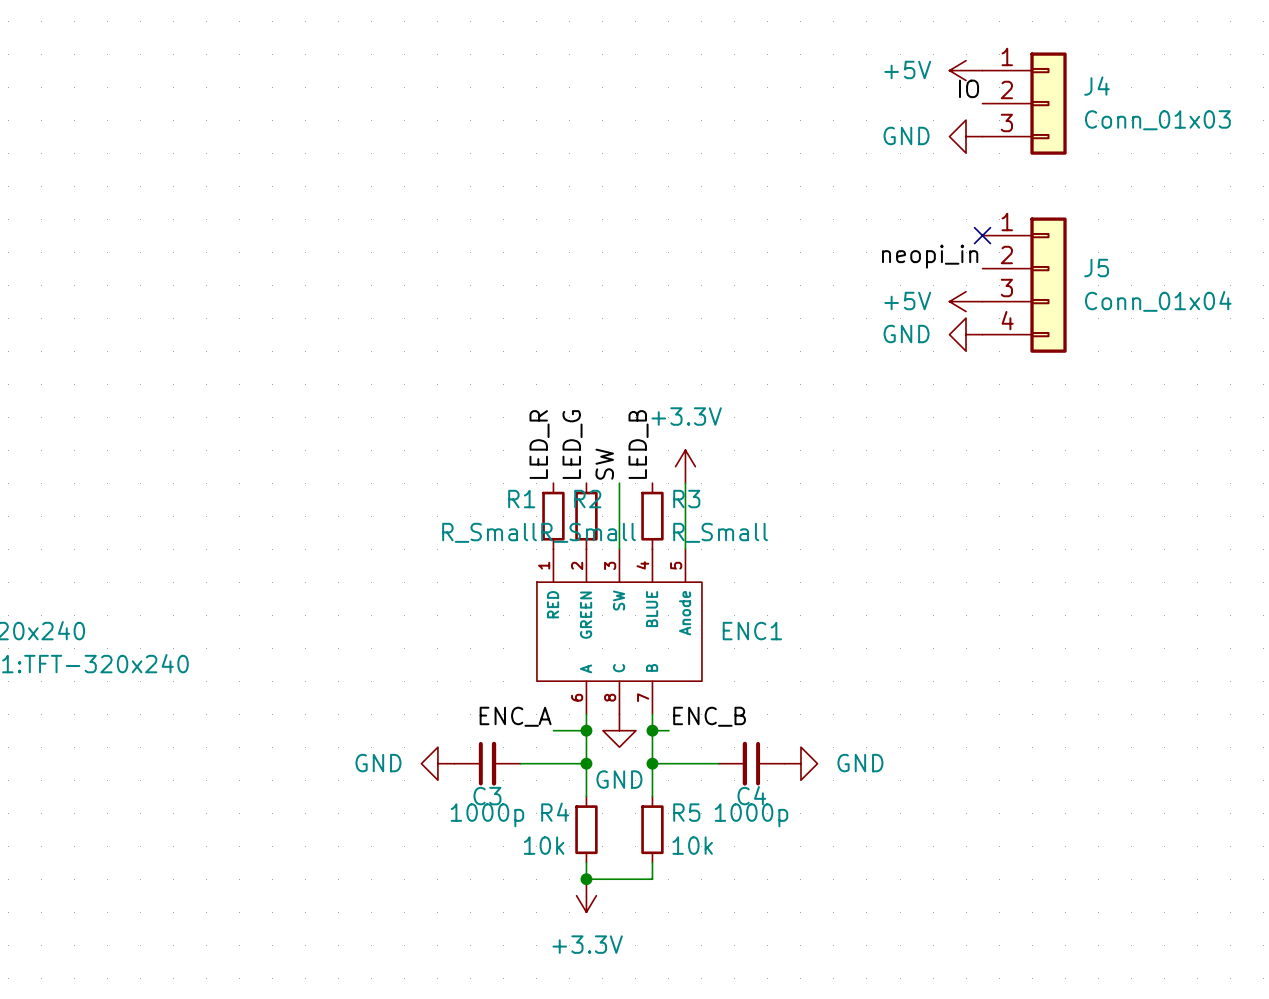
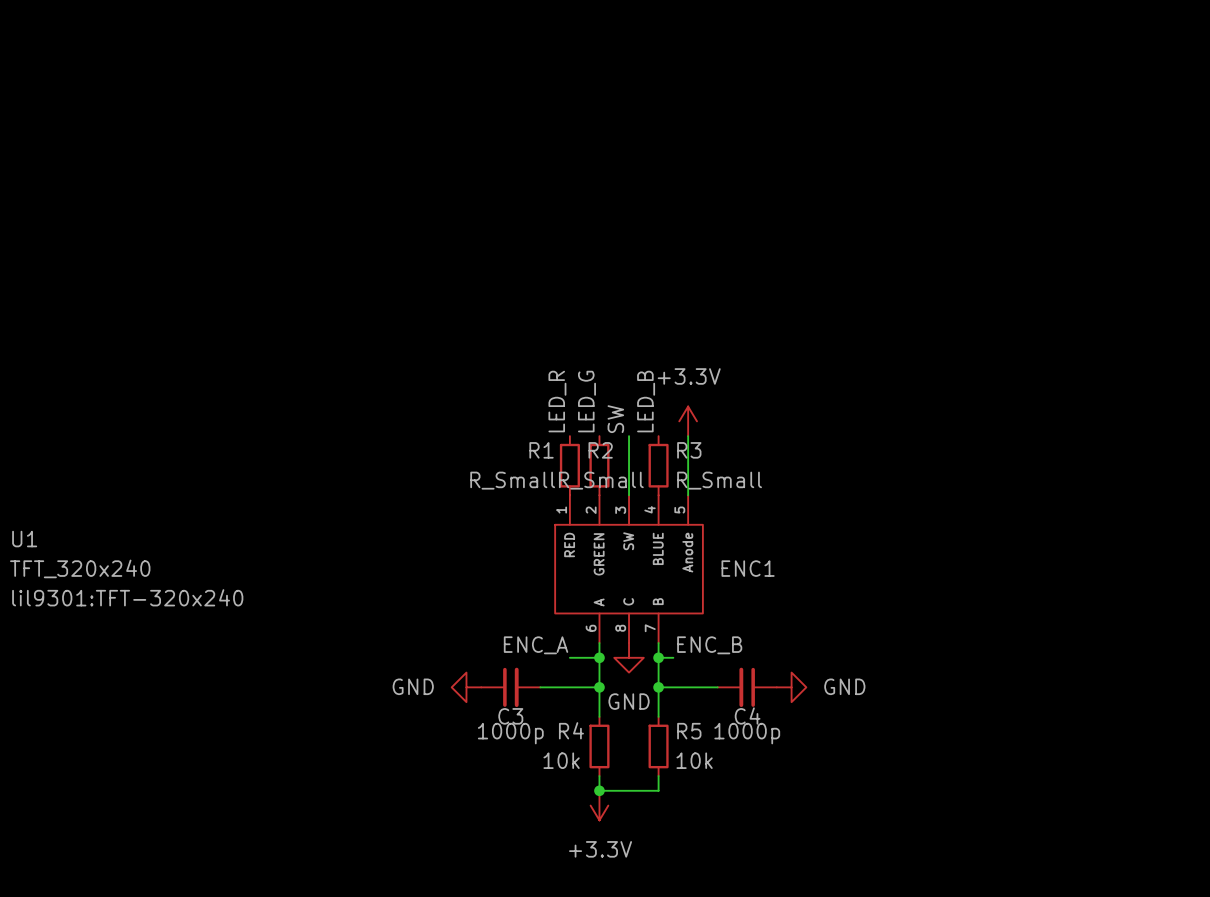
power symbol: +5V (966, 70) -> none
label: IO (969, 88) -> none
J4: Conn_01x03 (1024, 103) -> none
power symbol: GND (966, 136) -> none
no-connect mark: (982, 235) -> none
label: neopi_in (930, 256) -> none
J5: Conn_01x04 (1024, 285) -> none
power symbol: +5V (966, 301) -> none
power symbol: GND (966, 334) -> none

